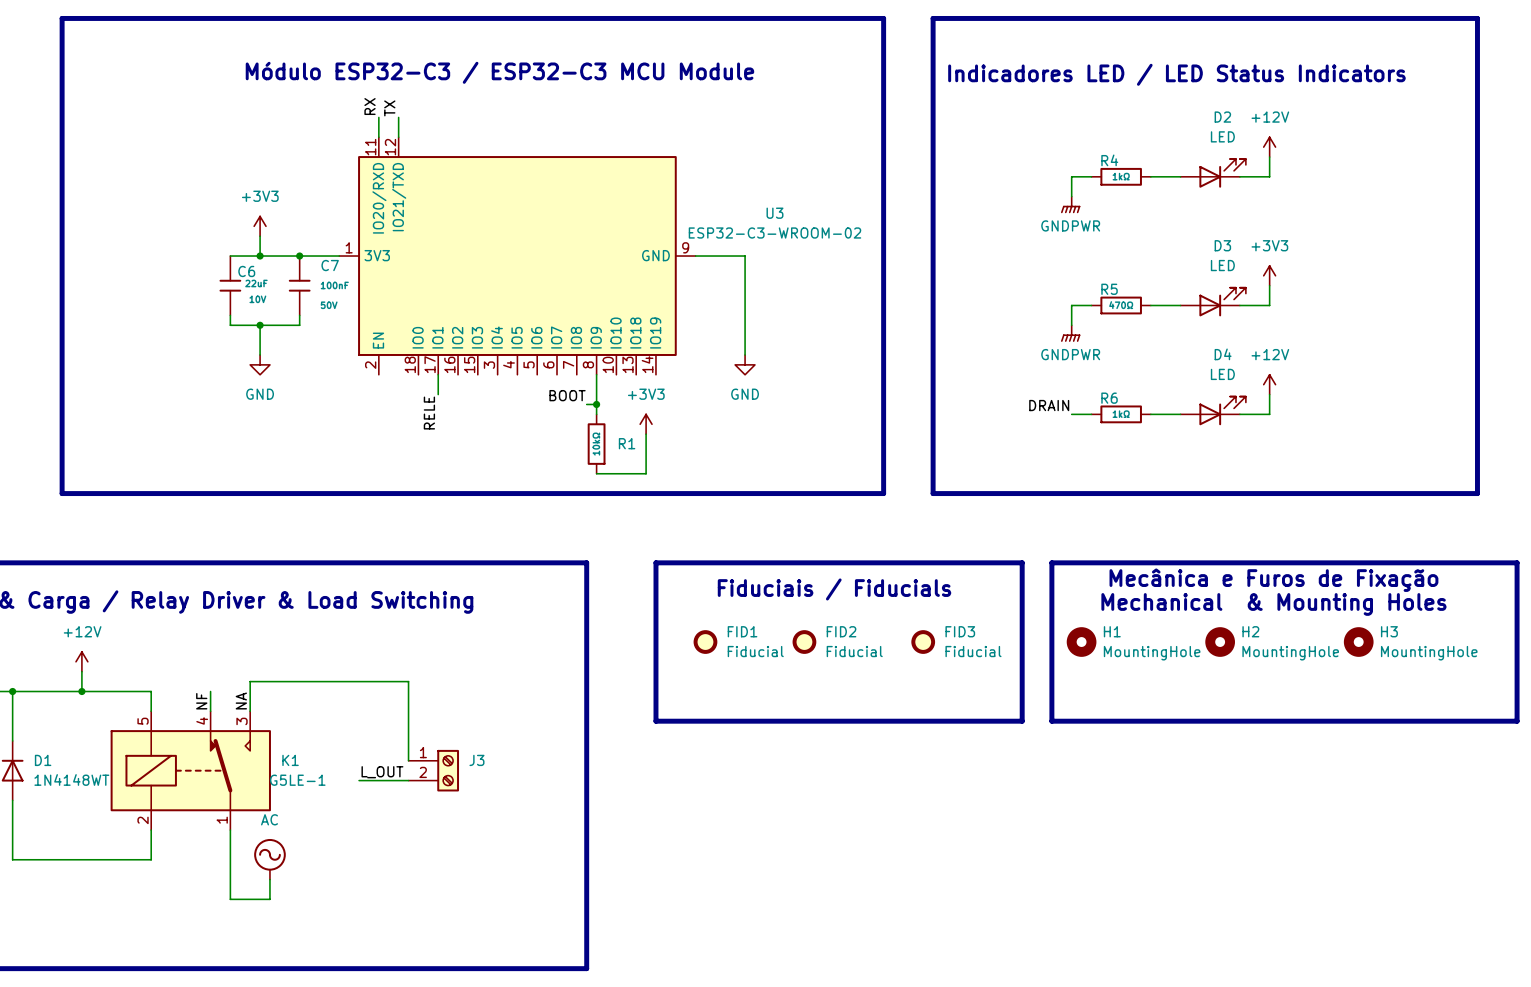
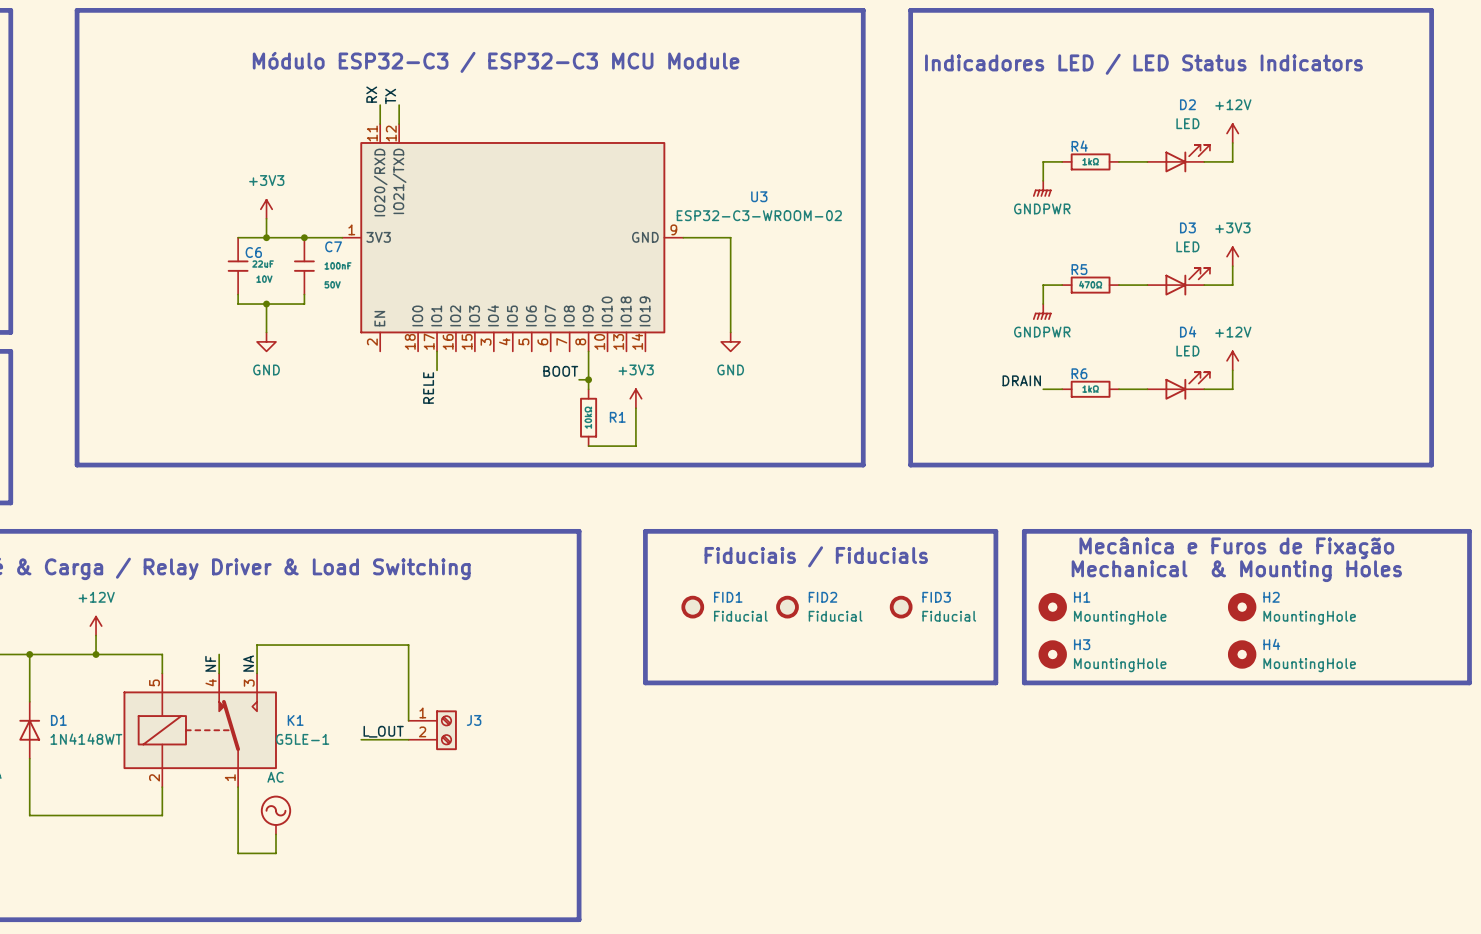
H2 position: (1220, 642) -> (1242, 607)
H3 position: (1358, 642) -> (1052, 654)
H4: none -> MountingHole (1242, 654)

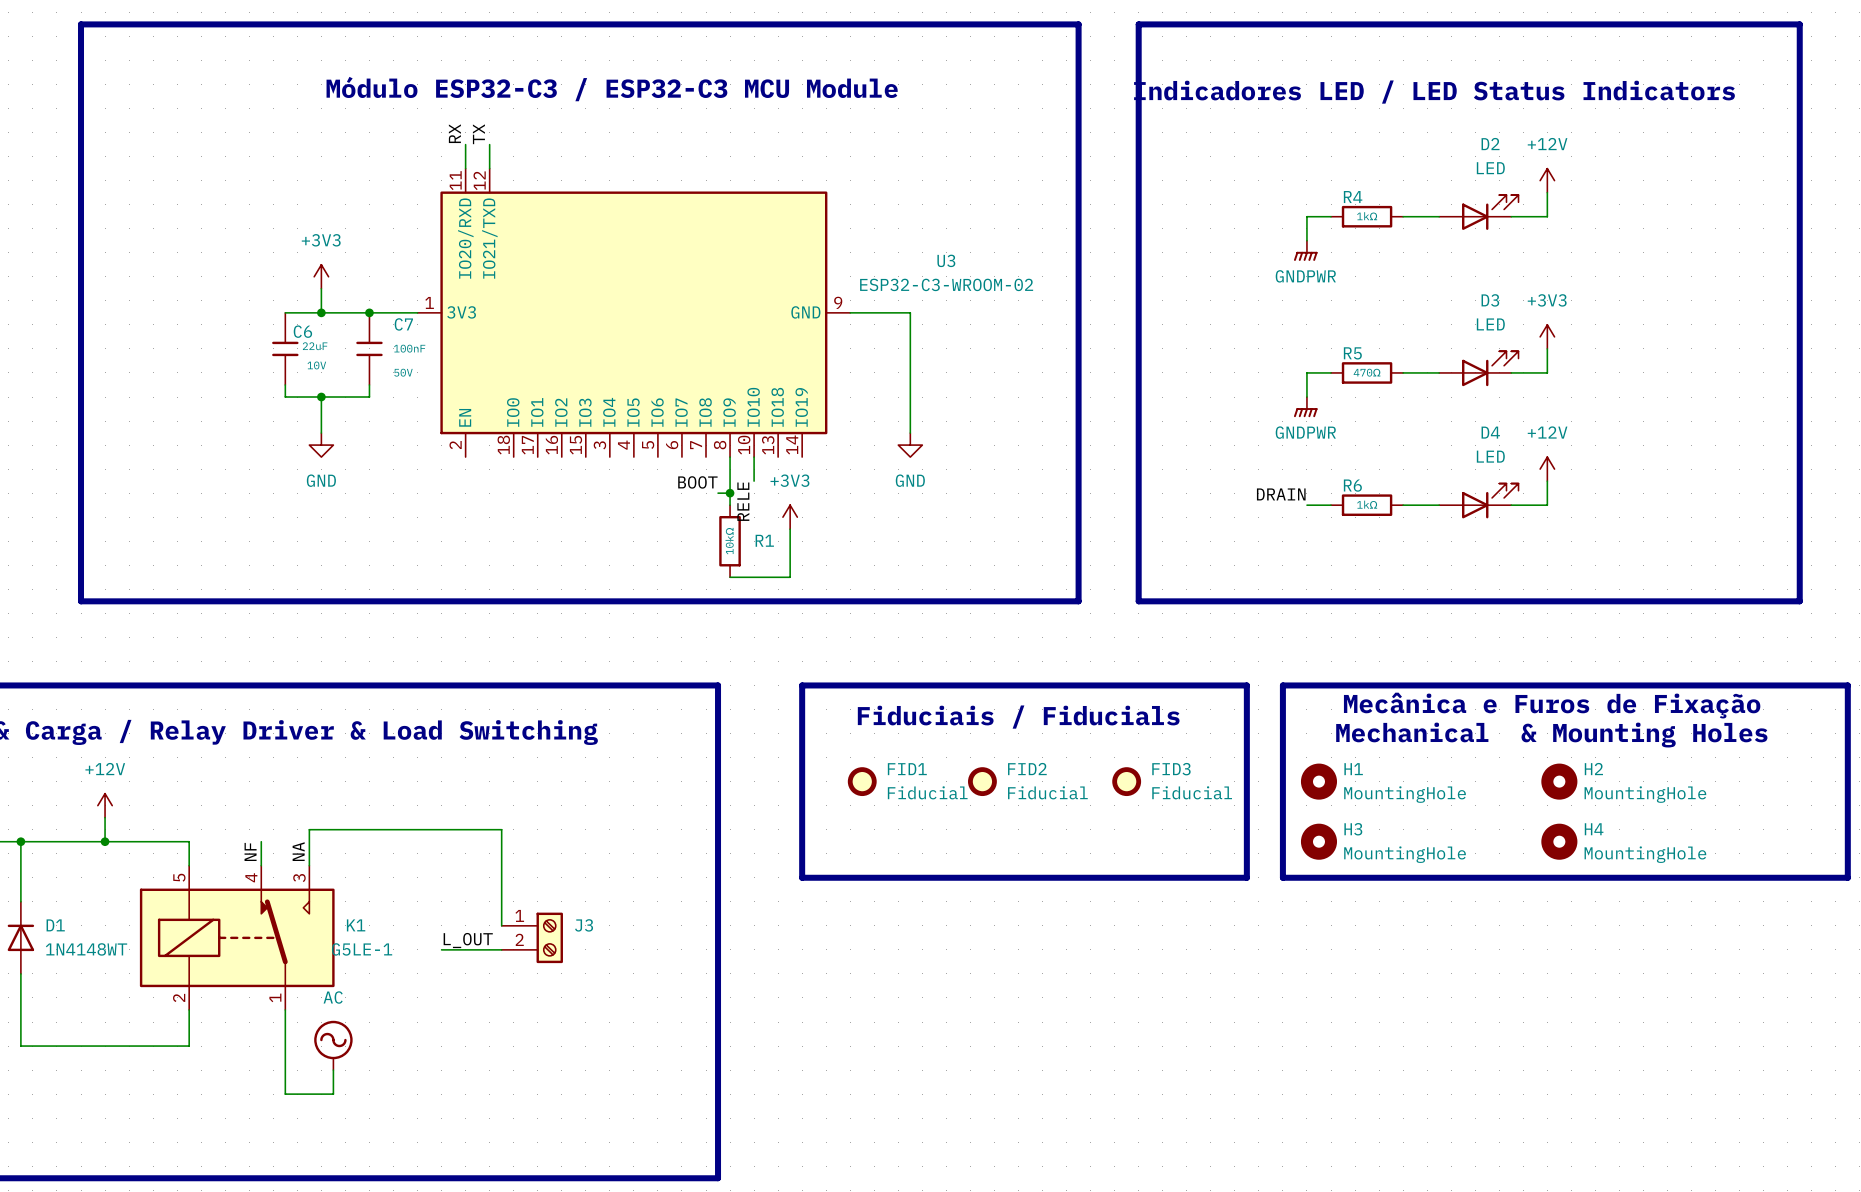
wire: (437, 351) (437, 370) -> (754, 457) (754, 481)
label position: RELE (428, 387) -> RELE (743, 501)

